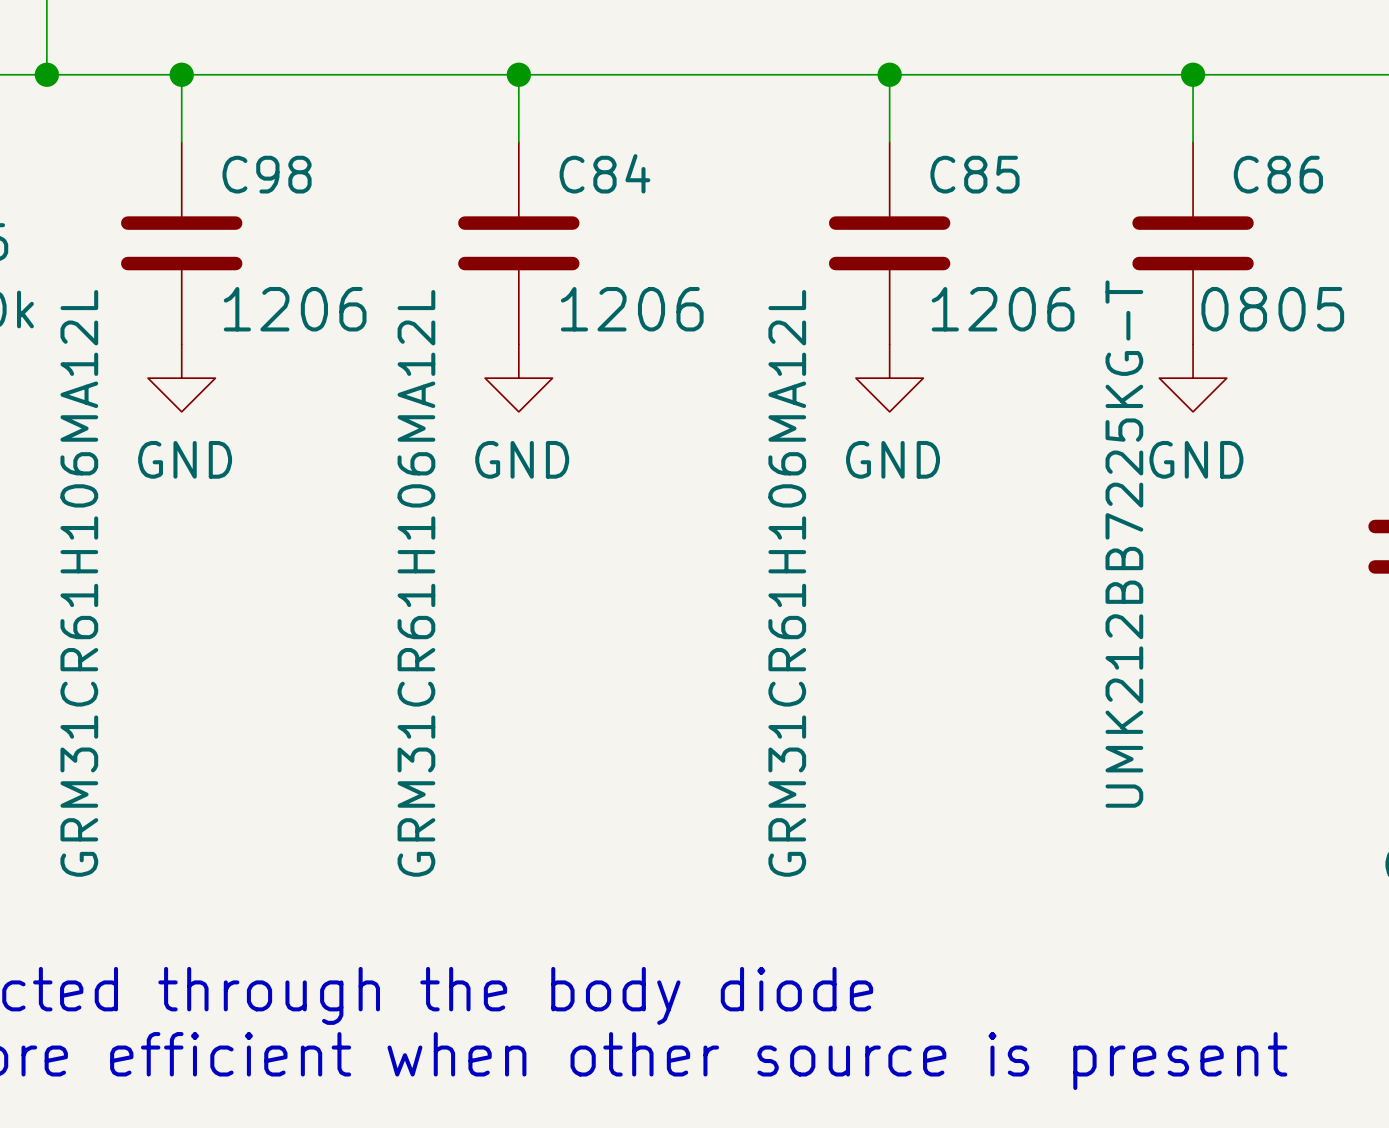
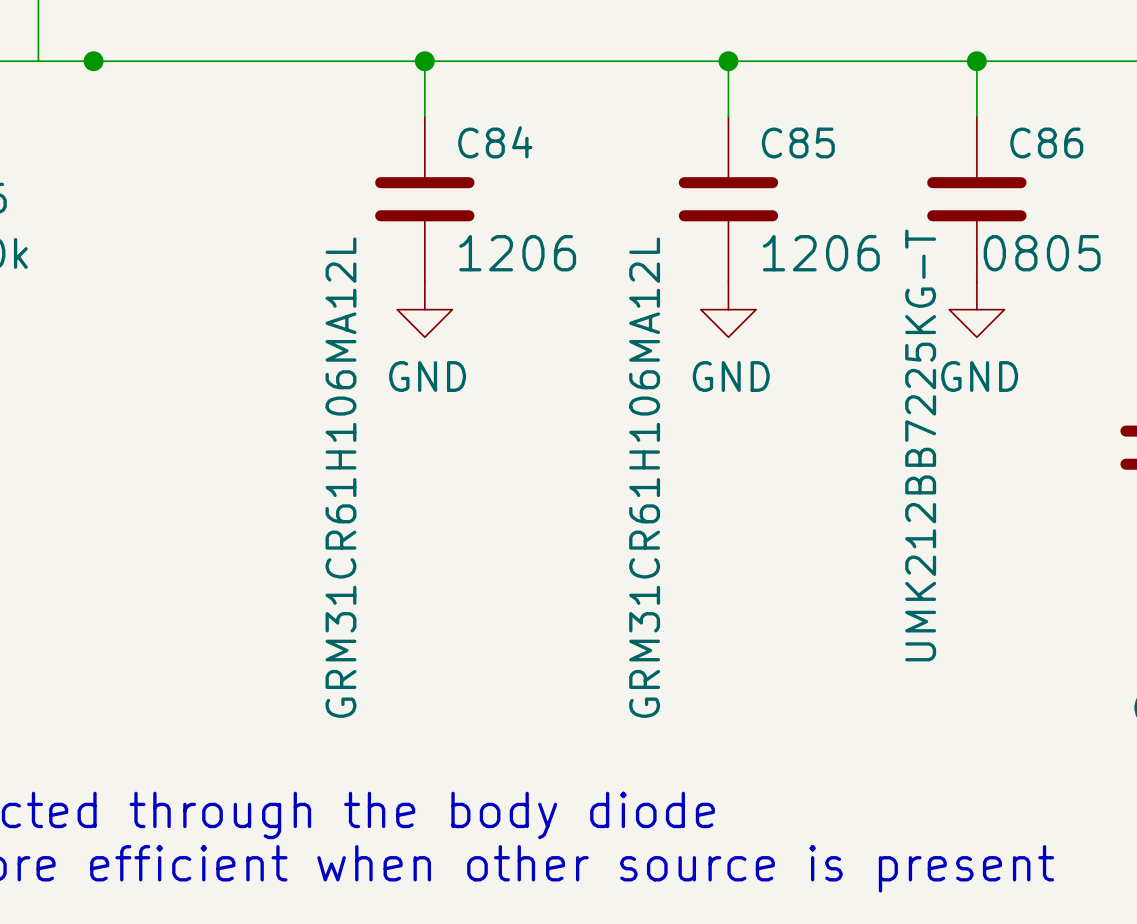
junction: (46, 74) -> none
junction: none -> (93, 61)
wire: (181, 74) (181, 142) -> none
junction: (181, 74) -> none
C98: GRM31CR61H106MA12L (181, 243) -> none
power symbol: GND (181, 378) -> none

